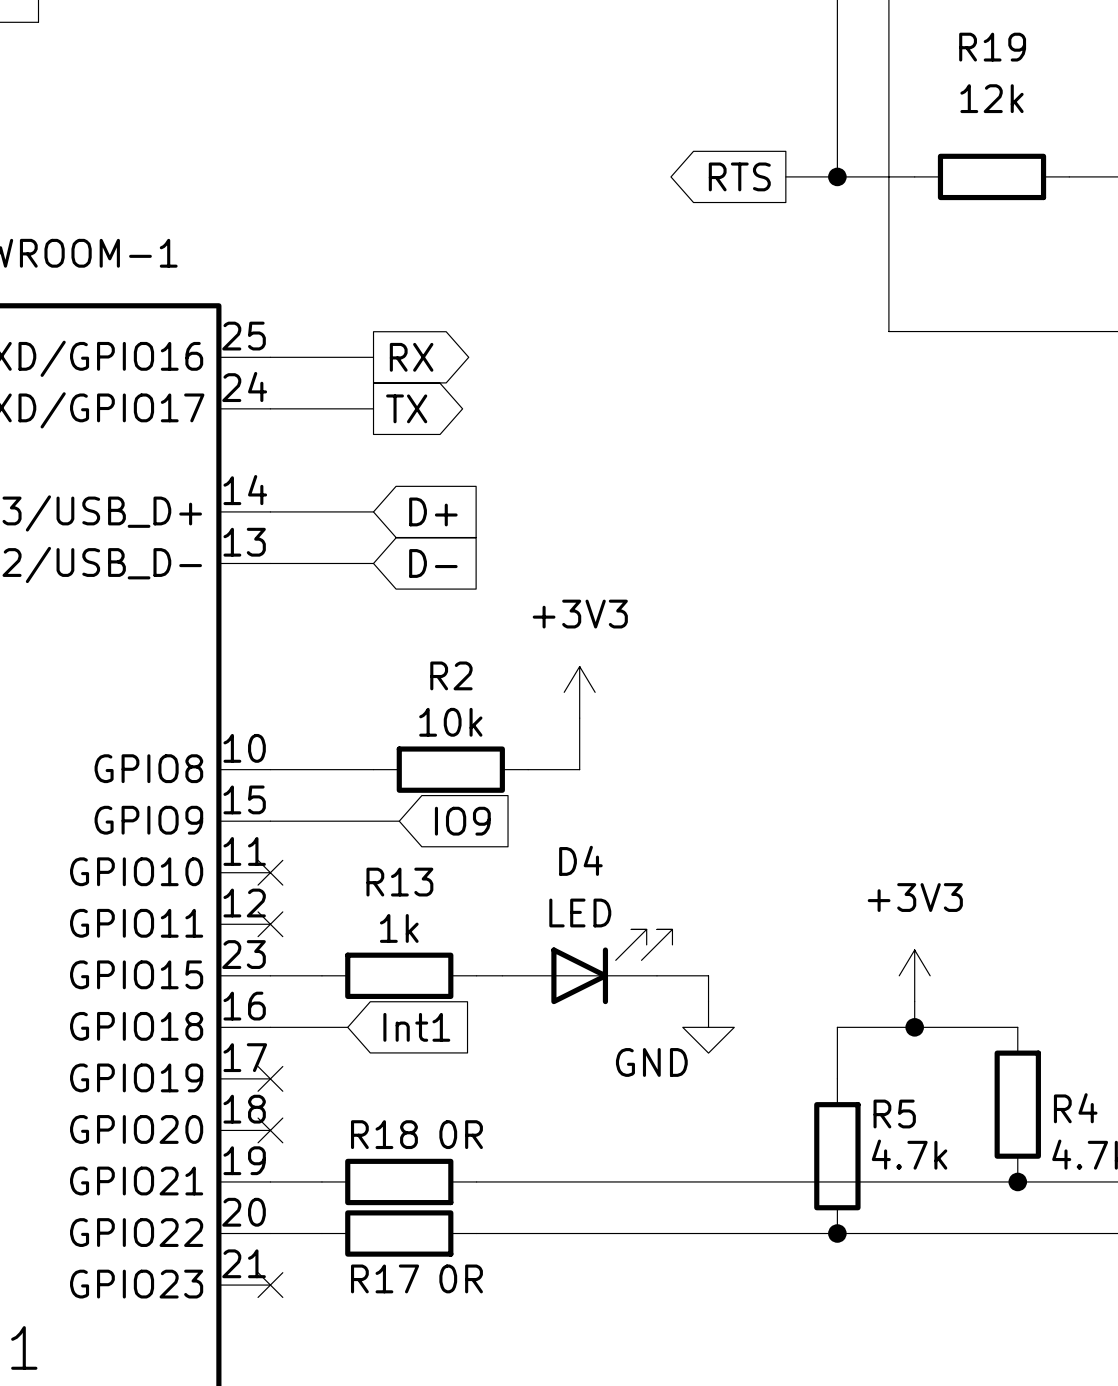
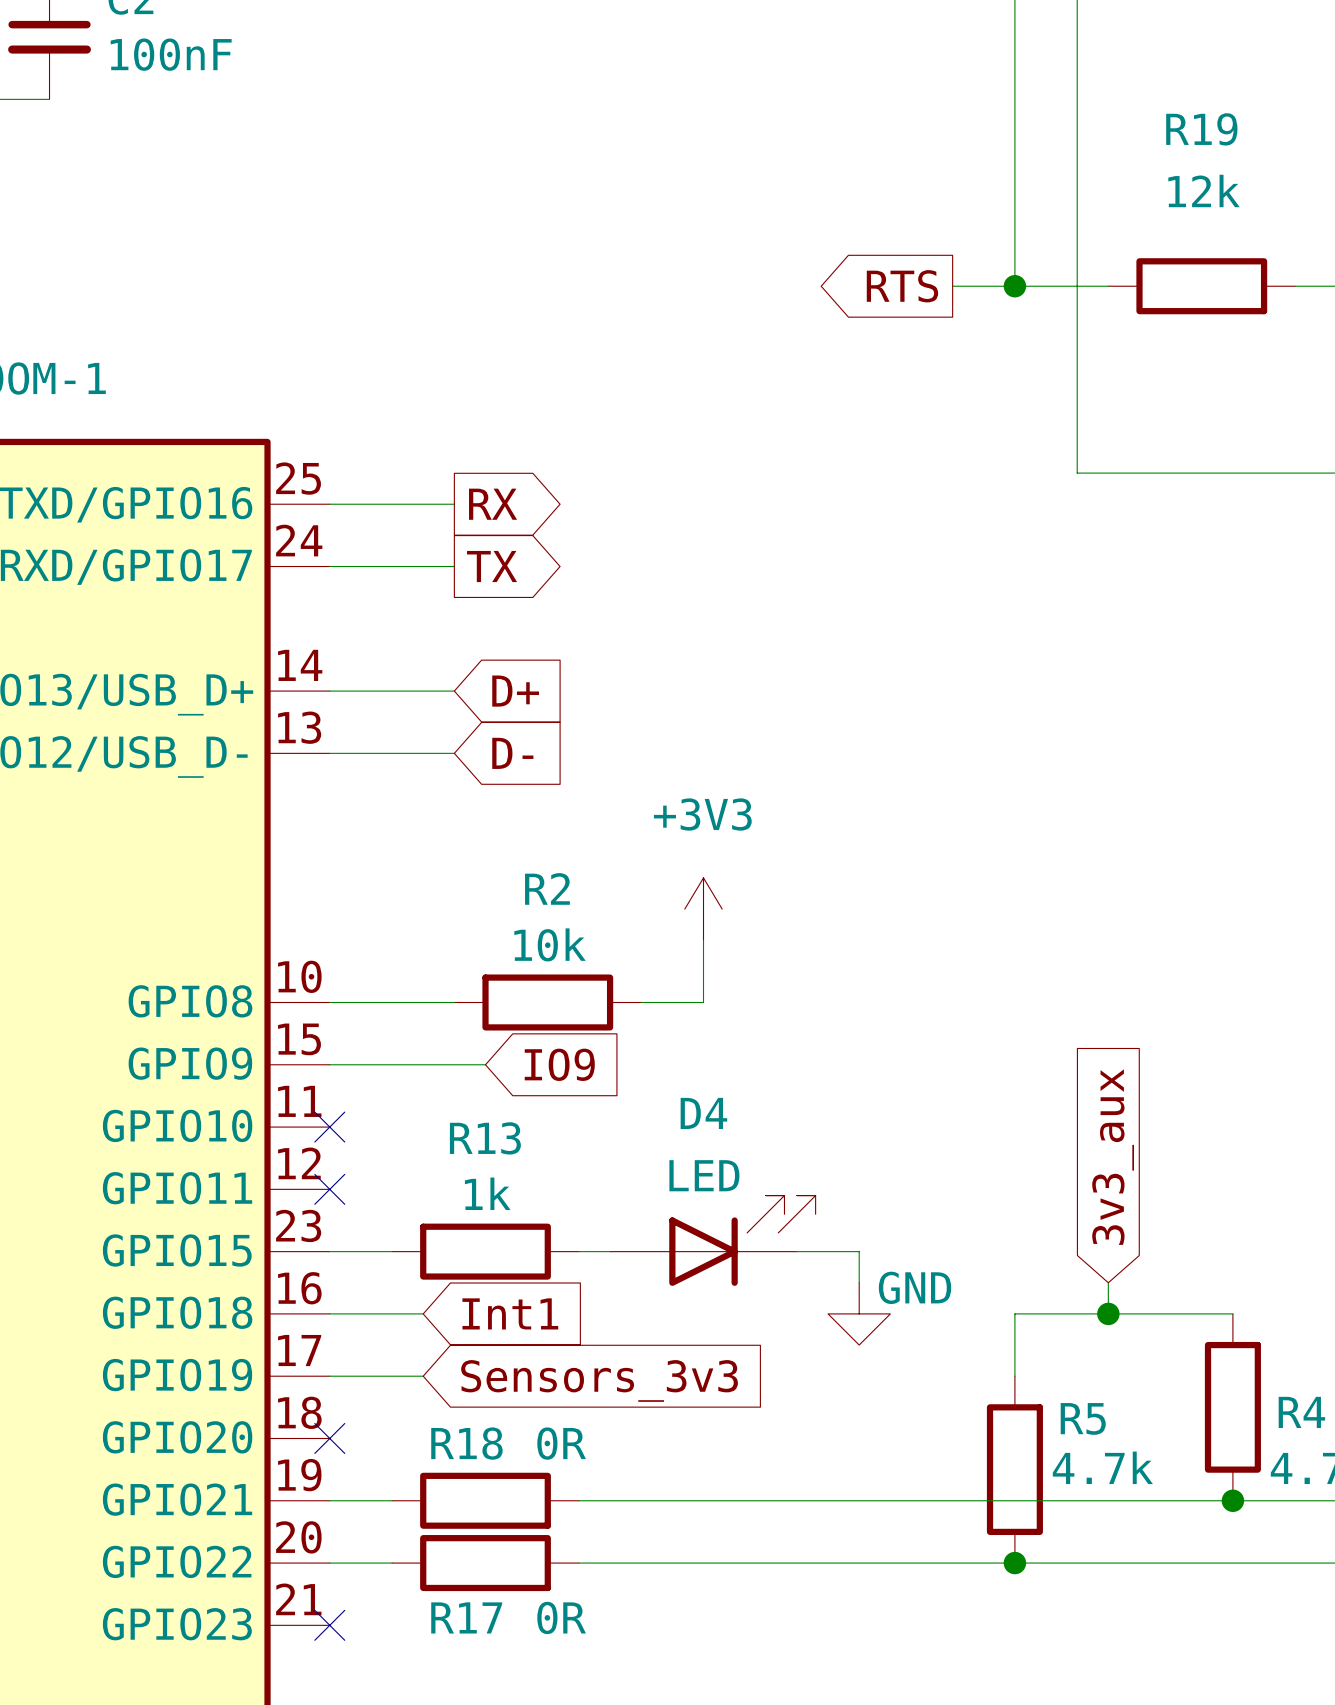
global label: none -> 3v3_aux (1113, 1157)
power symbol: +3V3 (914, 975) -> none
power symbol text position: GND (651, 1062) -> GND (915, 1287)
wire: none -> (329, 1376) (423, 1376)
no-connect mark: (270, 1078) -> none
global label: none -> Sensors_3v3 (599, 1380)

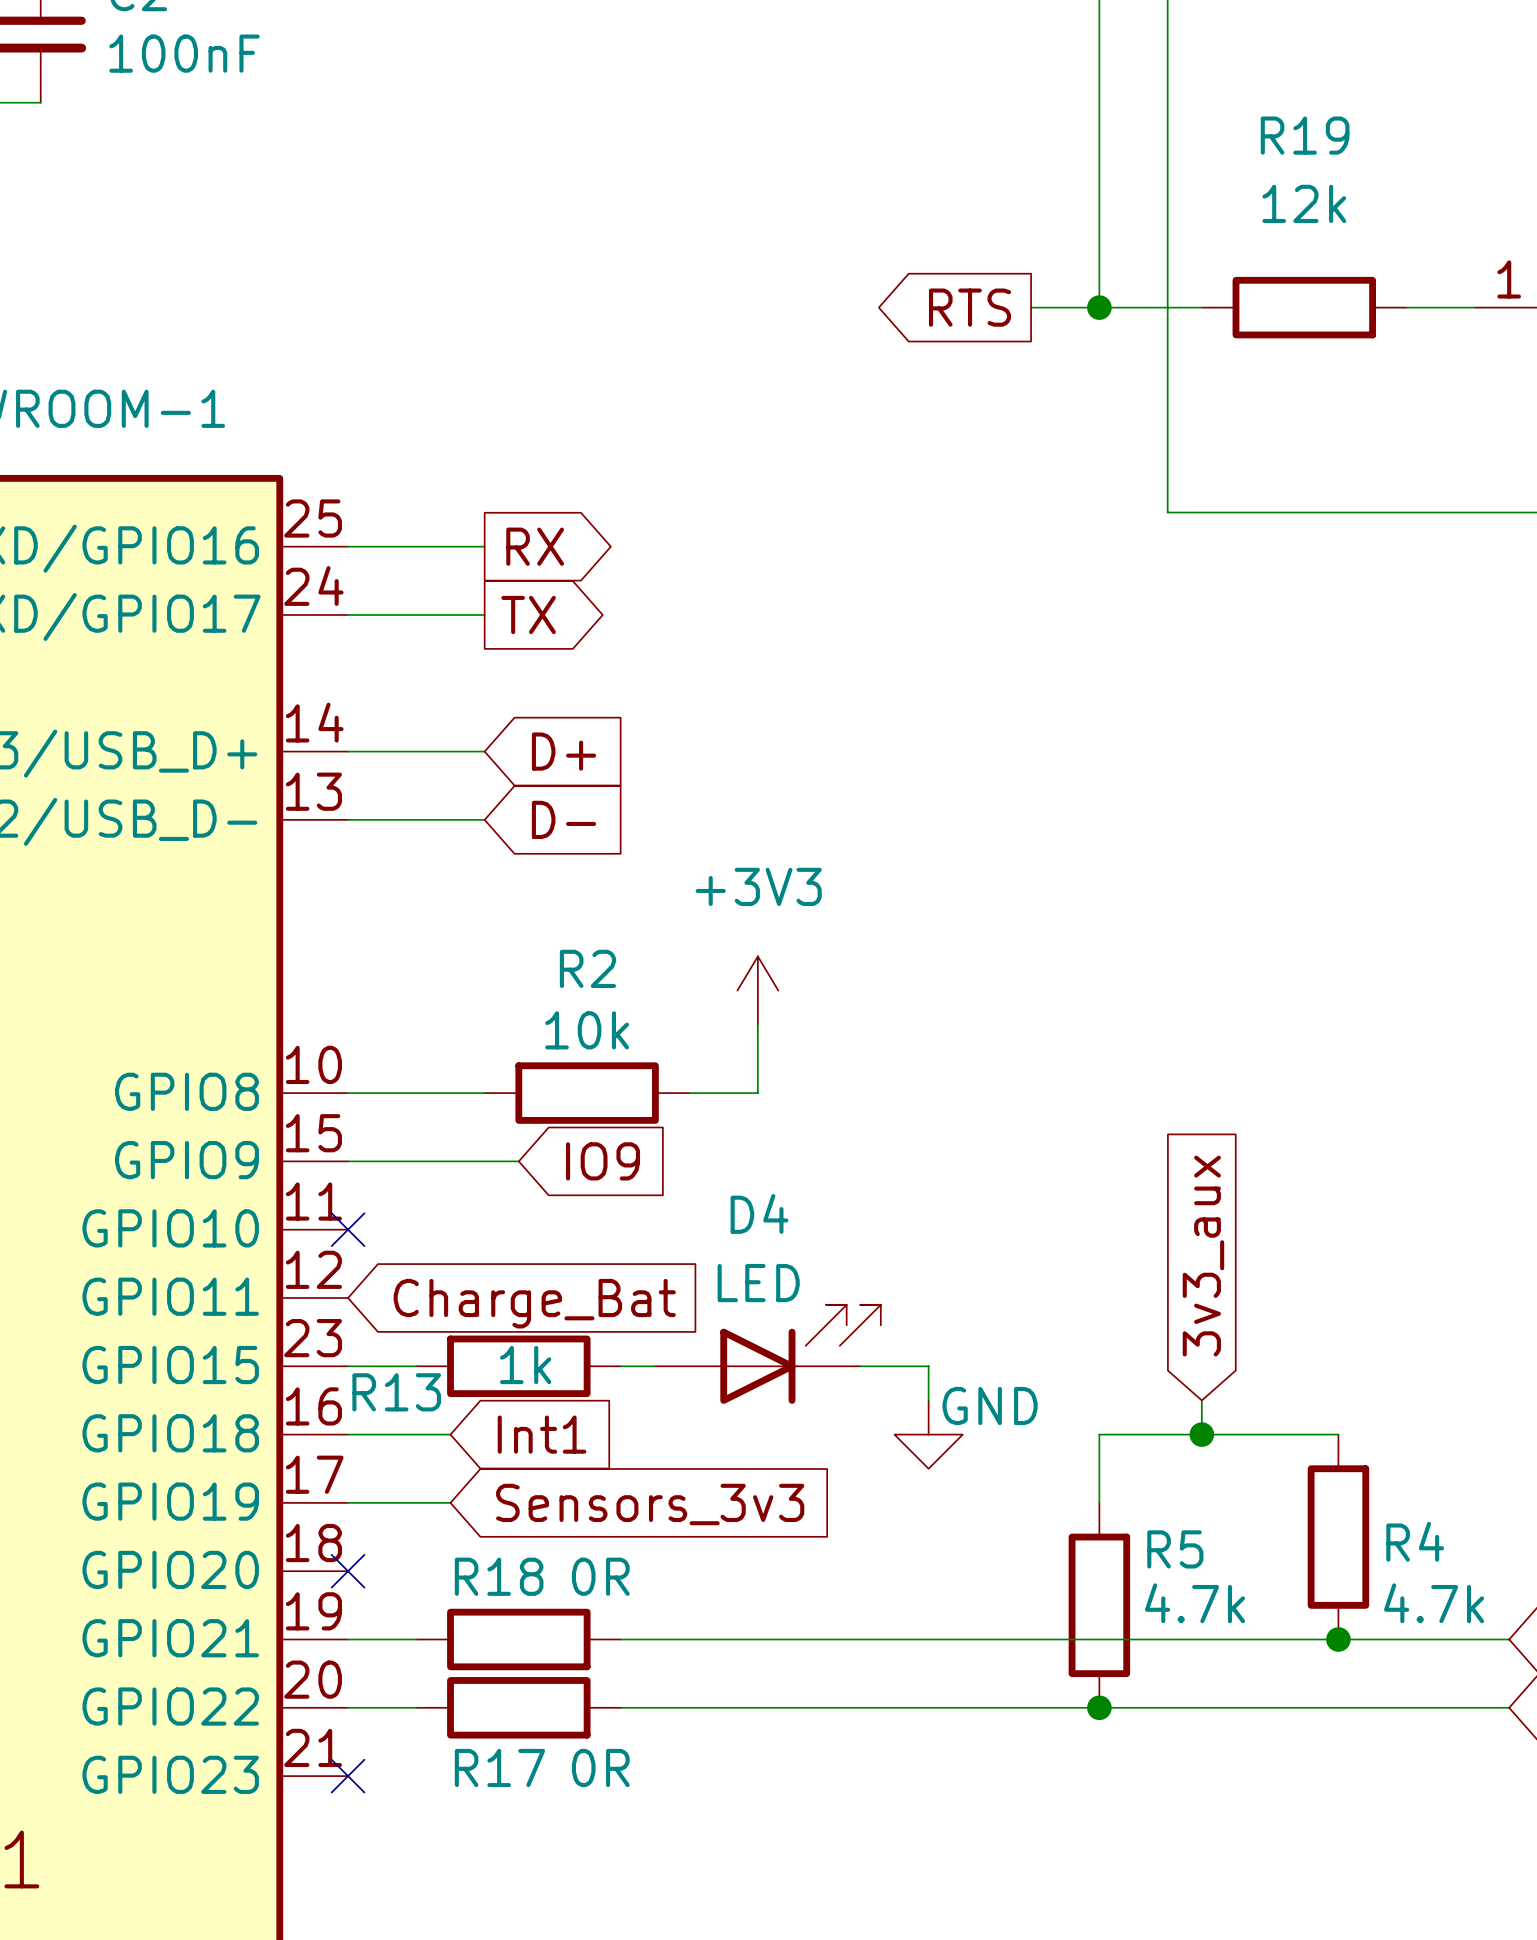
R13 name position: R13 (485, 1138) -> R13 (396, 1392)
no-connect mark: (329, 1189) -> none
R13 value position: 1k (487, 1193) -> 1k (525, 1365)
global label: none -> Charge_Bat (534, 1303)

